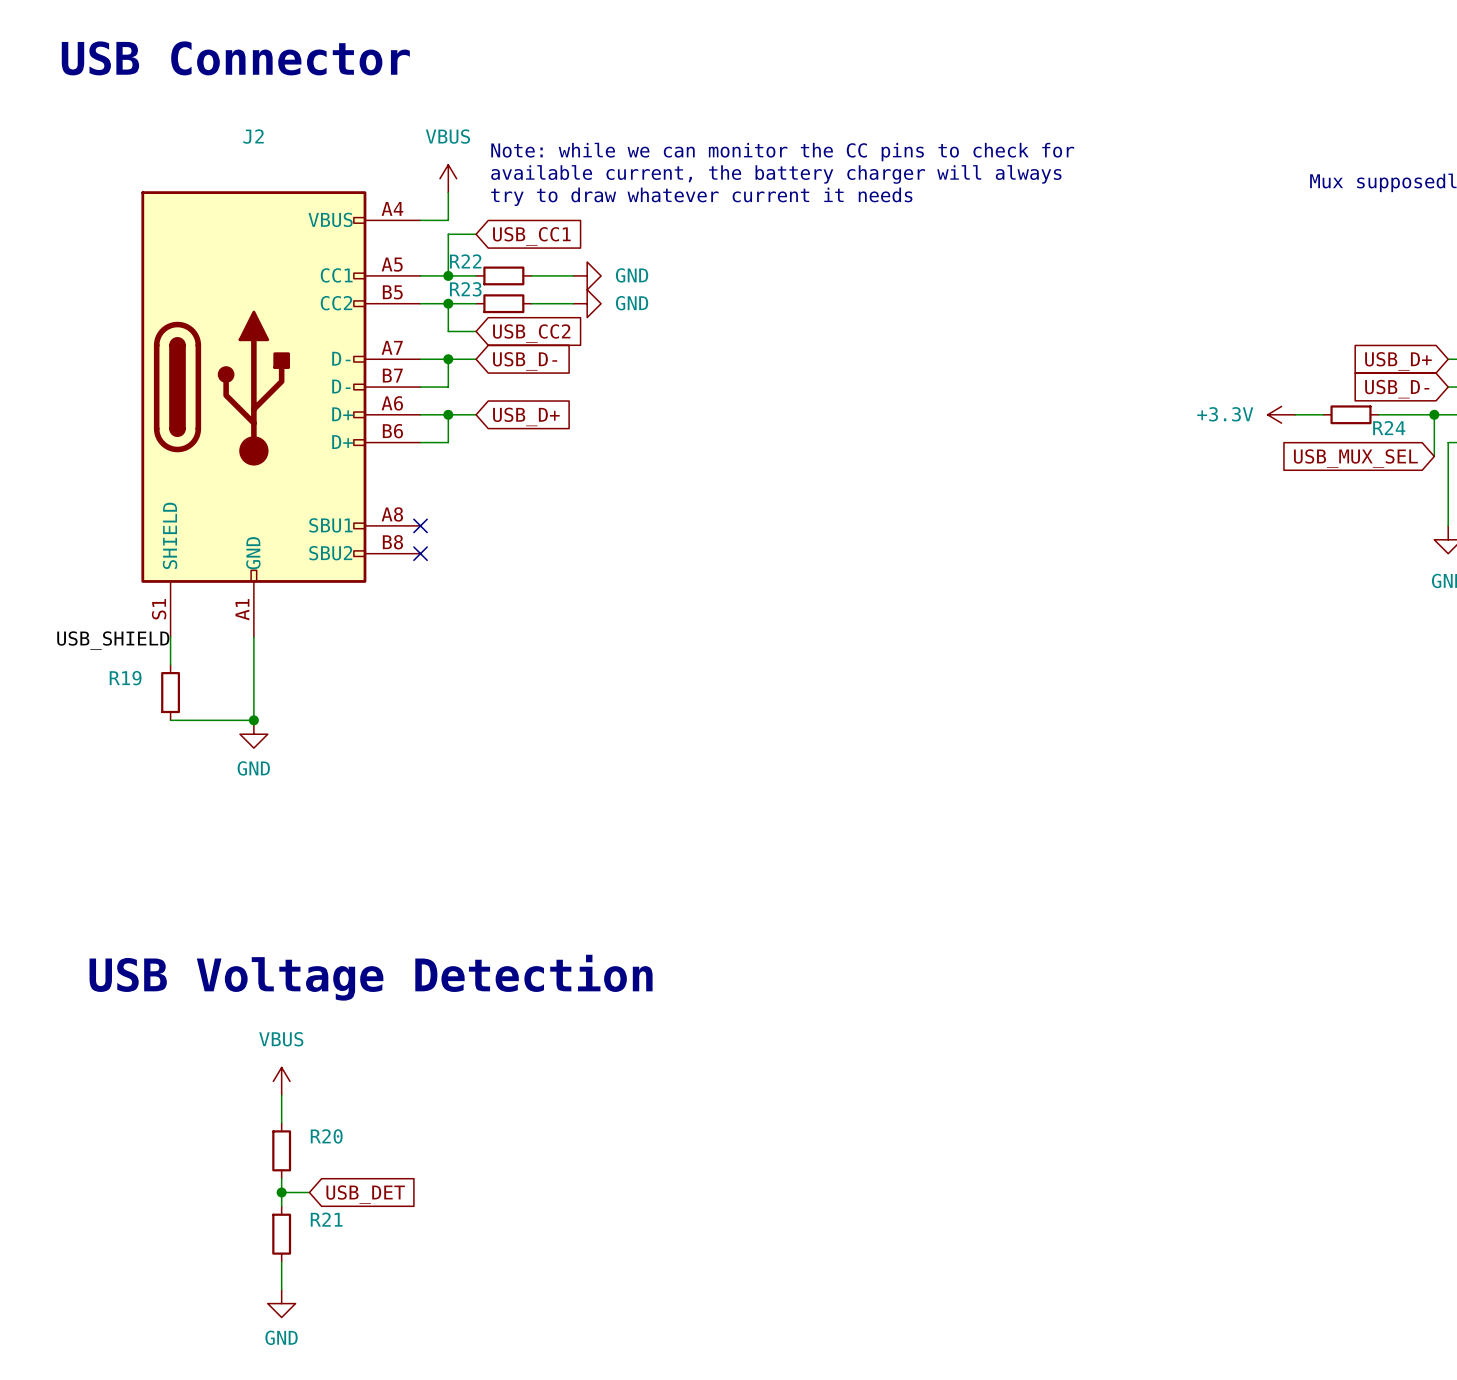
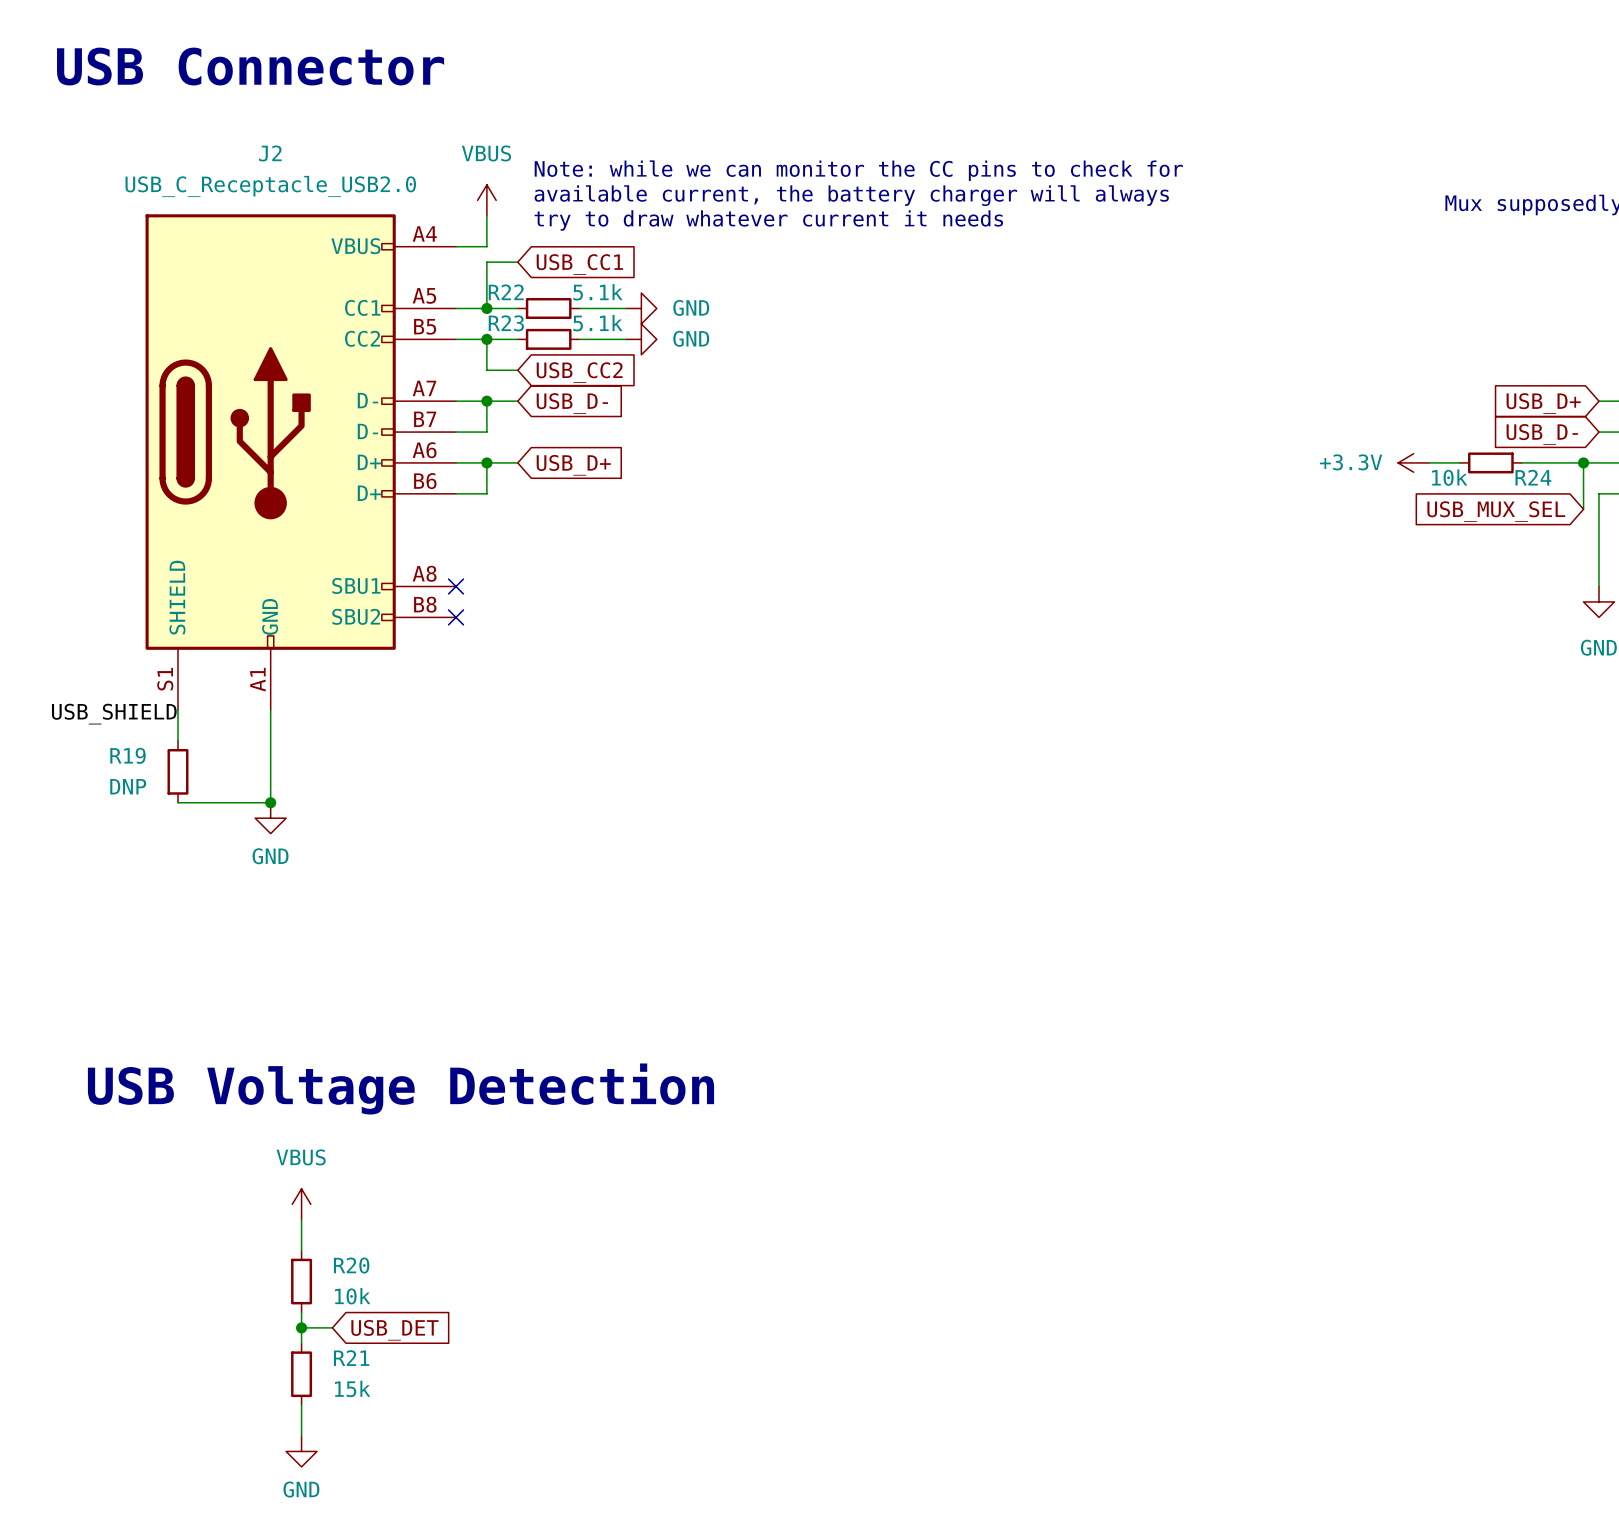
J2 value: none -> USB_C_Receptacle_USB2.0 (270, 186)
R22 value: none -> 5.1k (597, 292)
R23 value: none -> 5.1k (597, 323)
R24 value: none -> 10k (1449, 477)
R19 value: none -> DNP (128, 786)
R20 value: none -> 10k (352, 1296)
R21 value: none -> 15k (352, 1388)

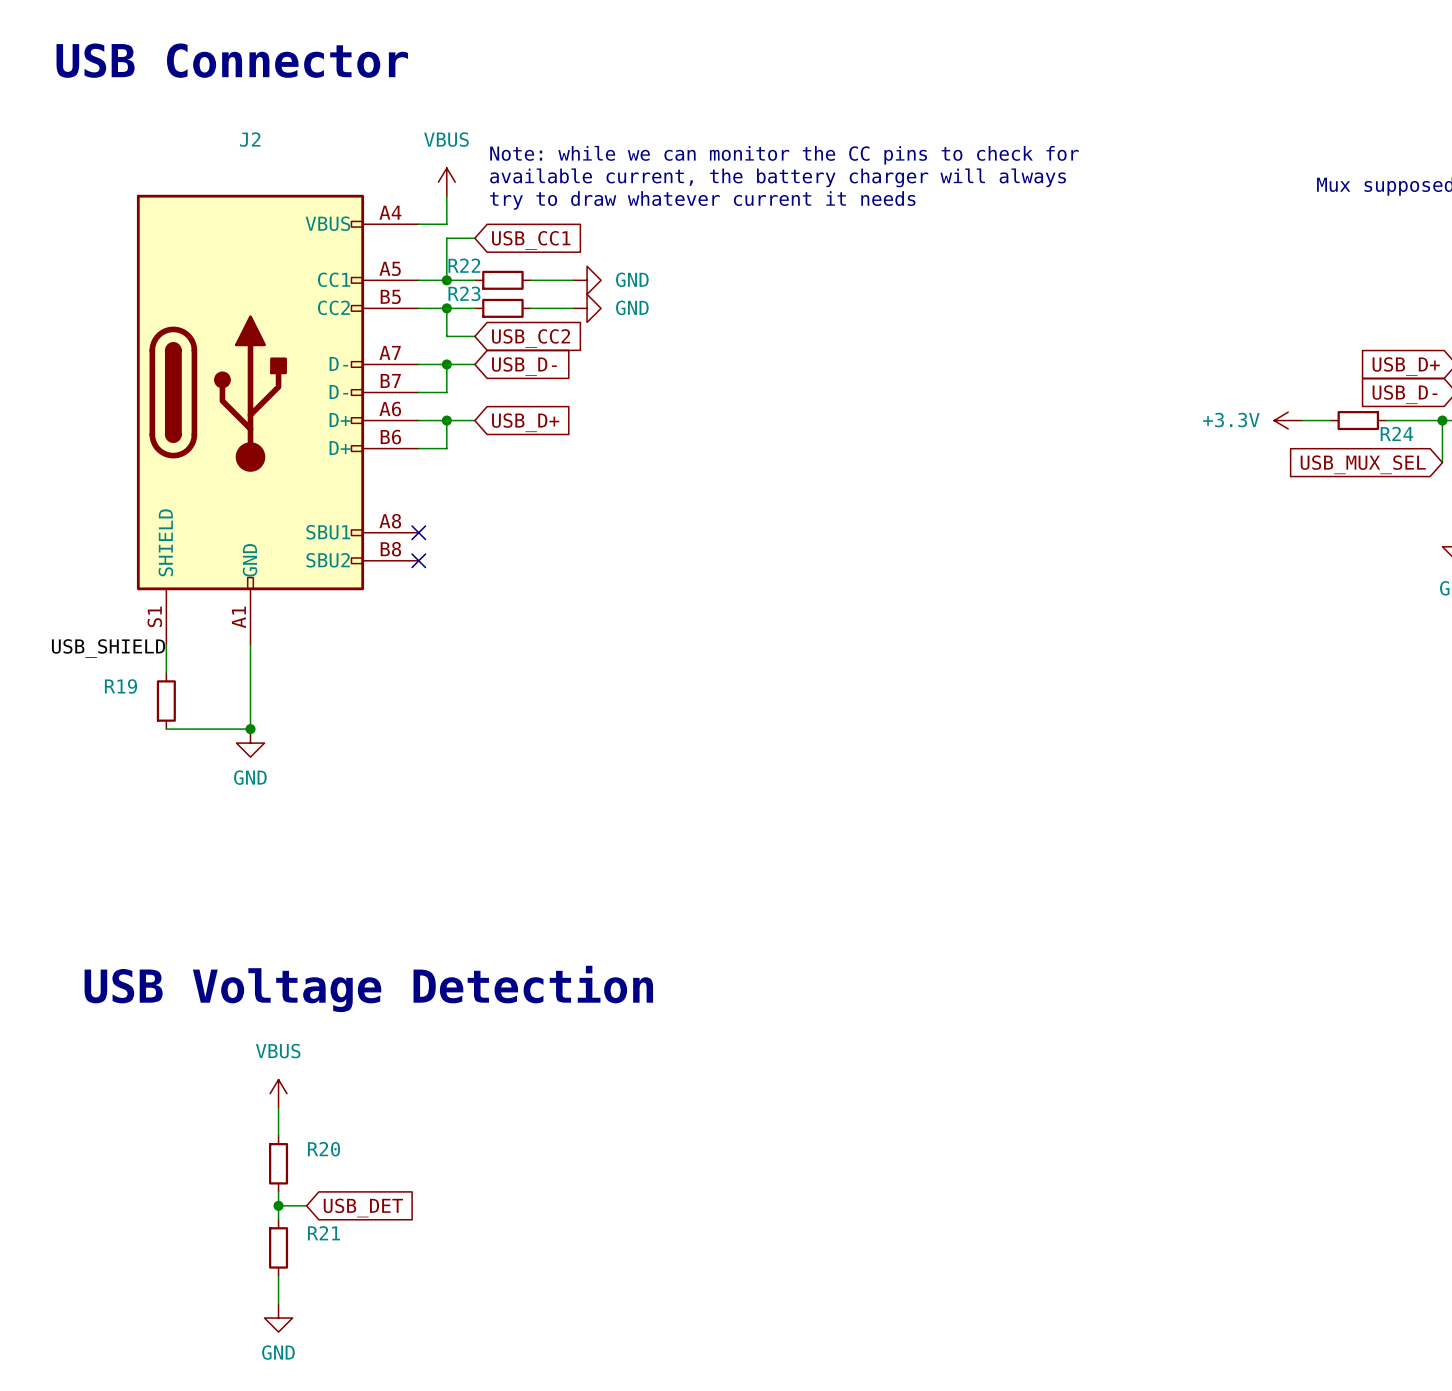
J2 value: USB_C_Receptacle_USB2.0 (270, 186) -> none
R22 value: 5.1k (597, 292) -> none
R23 value: 5.1k (597, 323) -> none
R24 value: 10k (1449, 477) -> none
R19 value: DNP (128, 786) -> none
R20 value: 10k (352, 1296) -> none
R21 value: 15k (352, 1388) -> none

